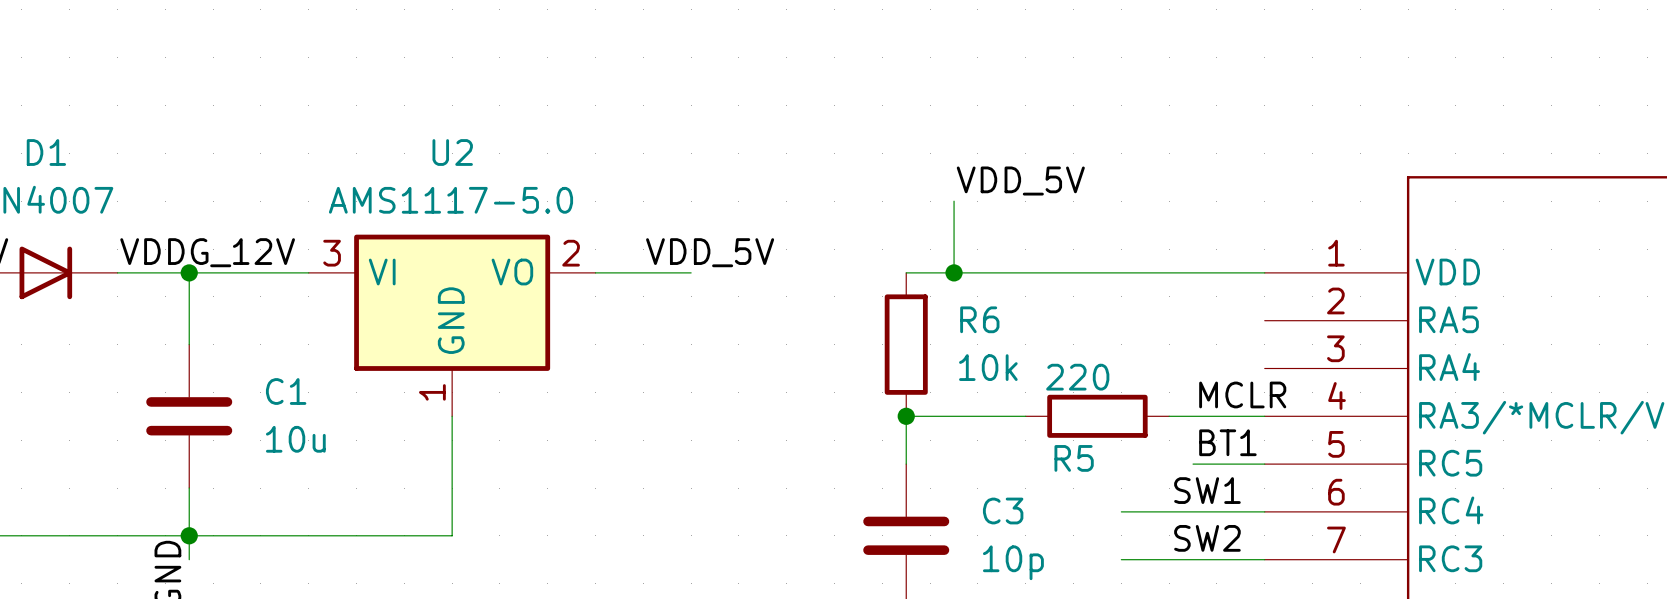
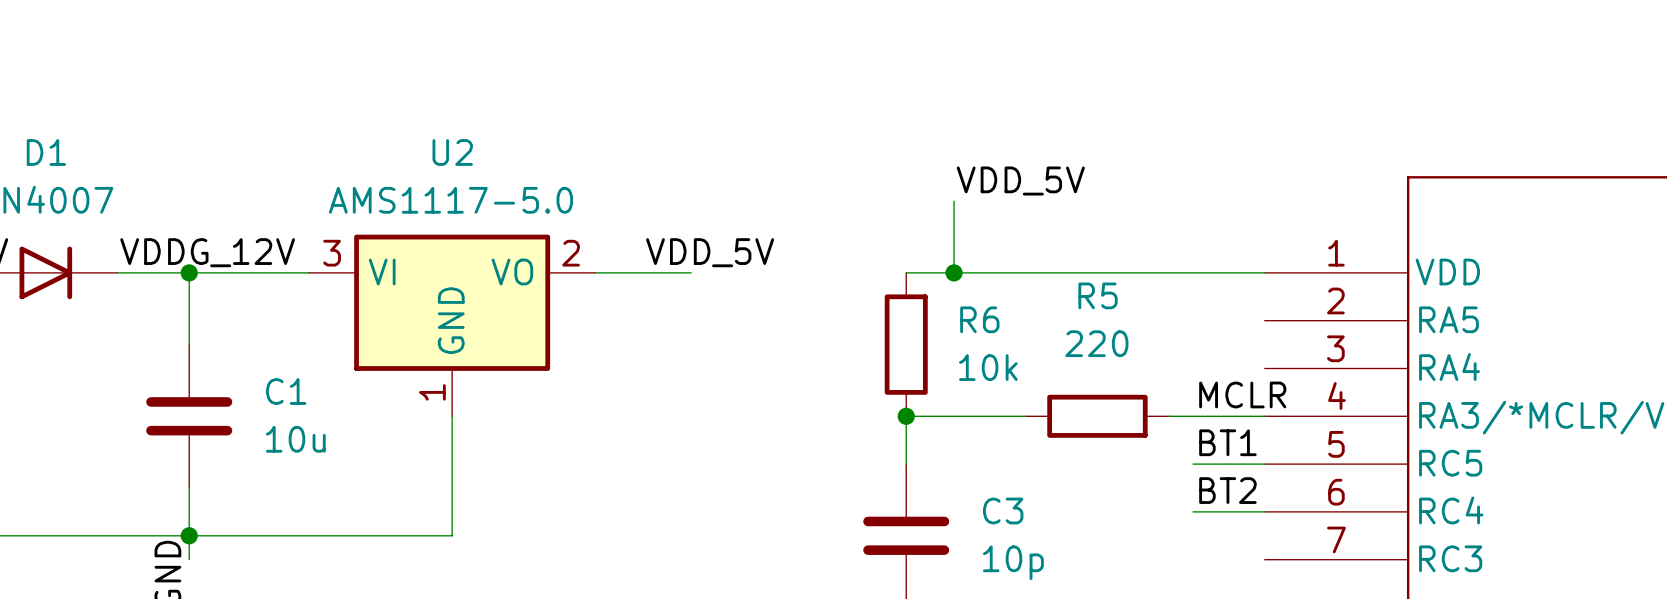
R5 value position: 220 (1077, 377) -> 220 (1096, 343)
R5 name position: R5 (1074, 458) -> R5 (1098, 295)
label: SW1 (1207, 490) -> none
label: none -> BT2 (1227, 490)
wire: (1121, 511) (1193, 511) -> none
label: SW2 (1207, 538) -> none
wire: (1121, 559) (1264, 559) -> none

